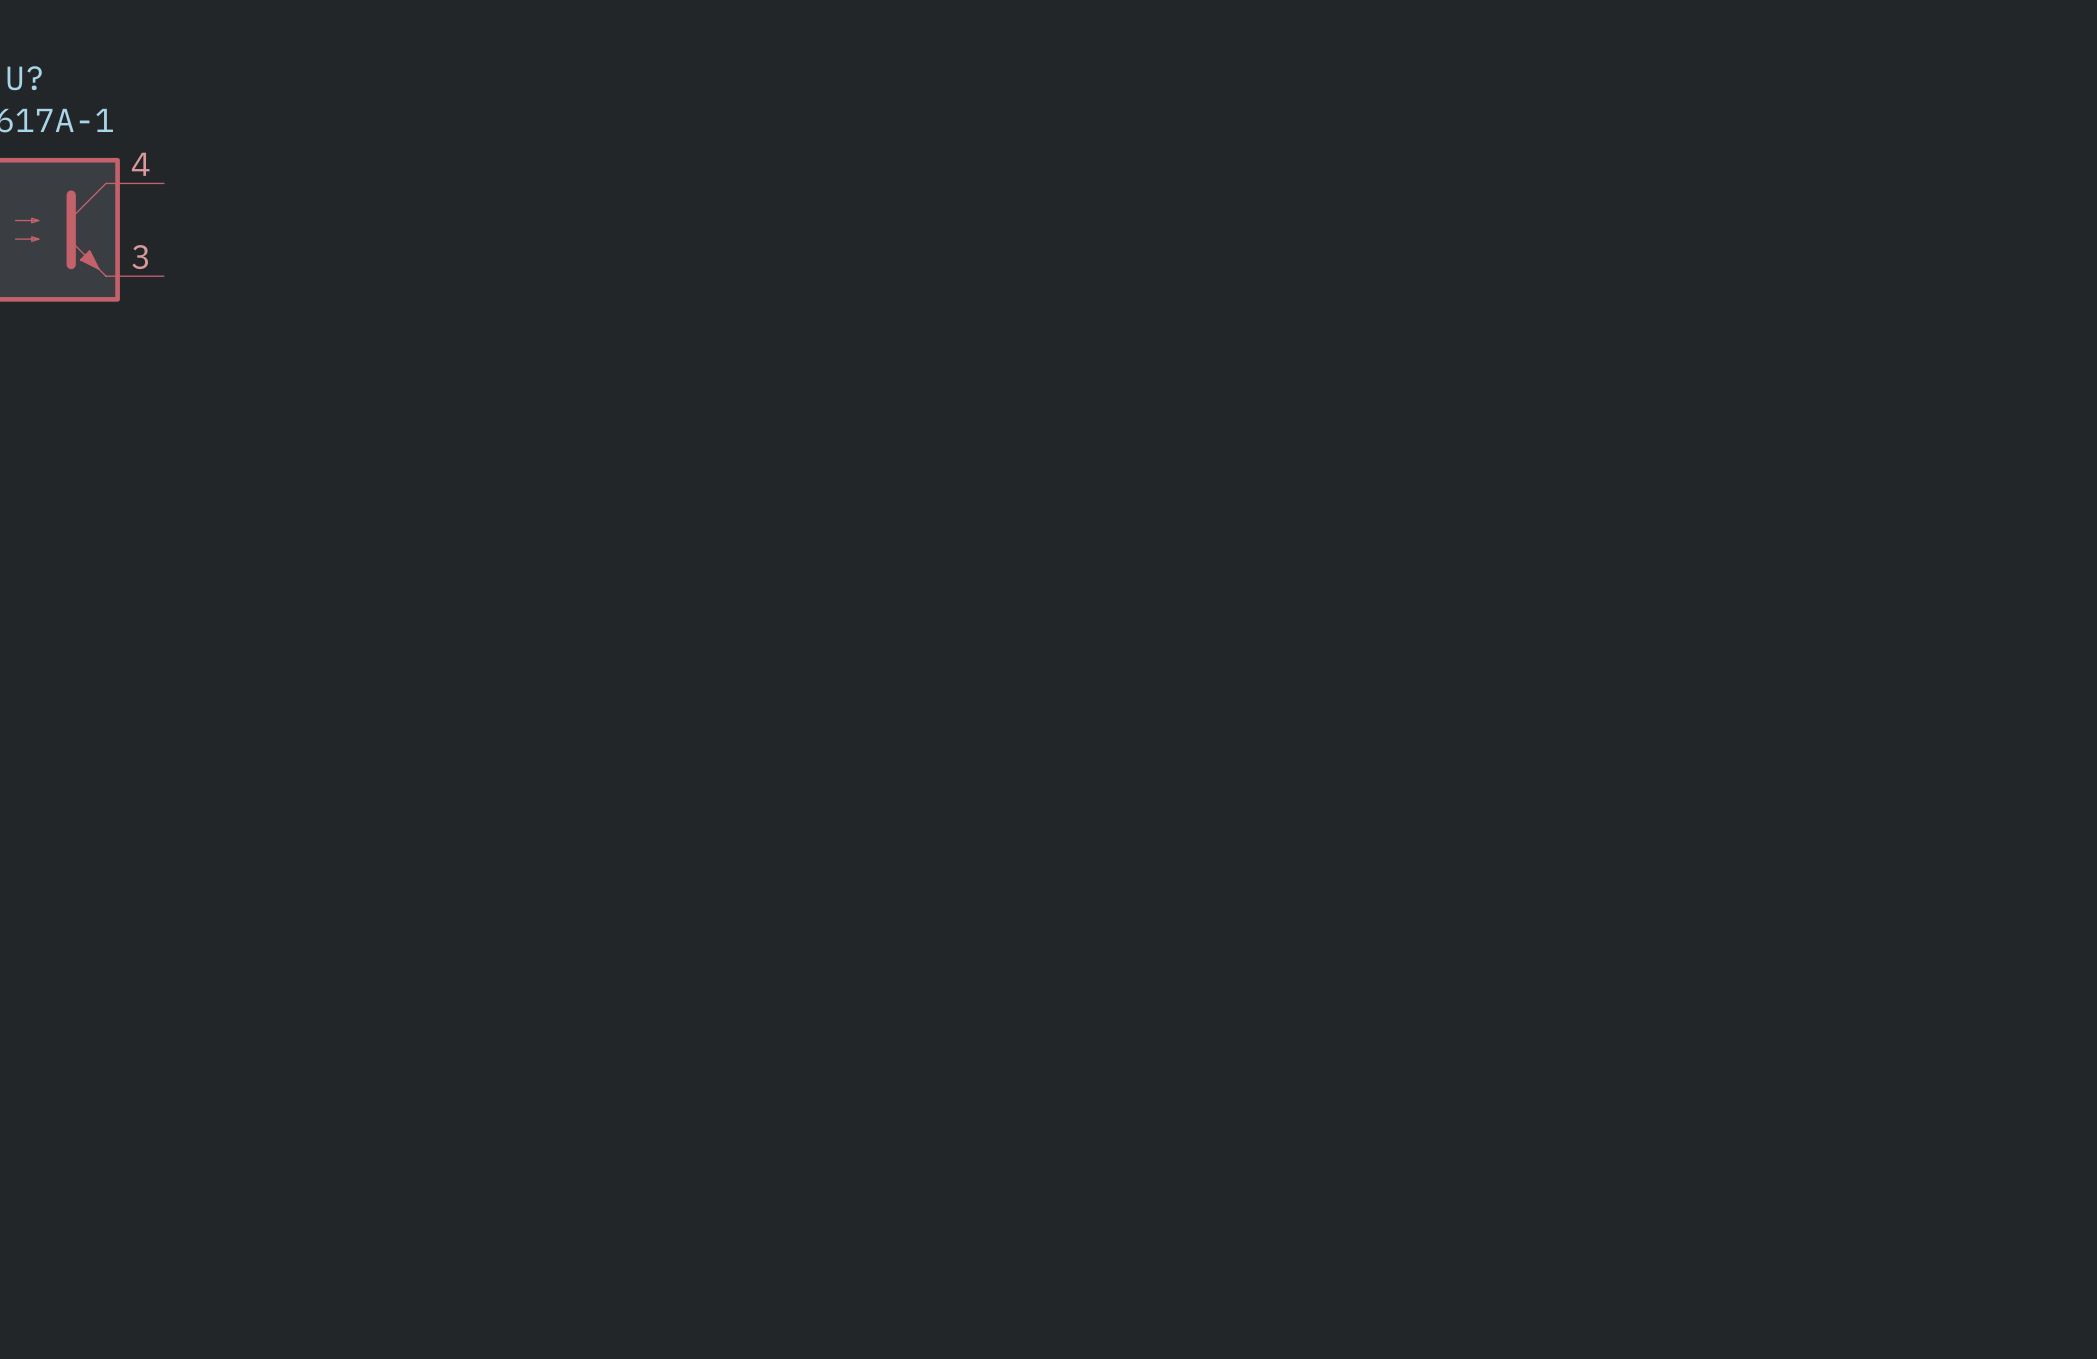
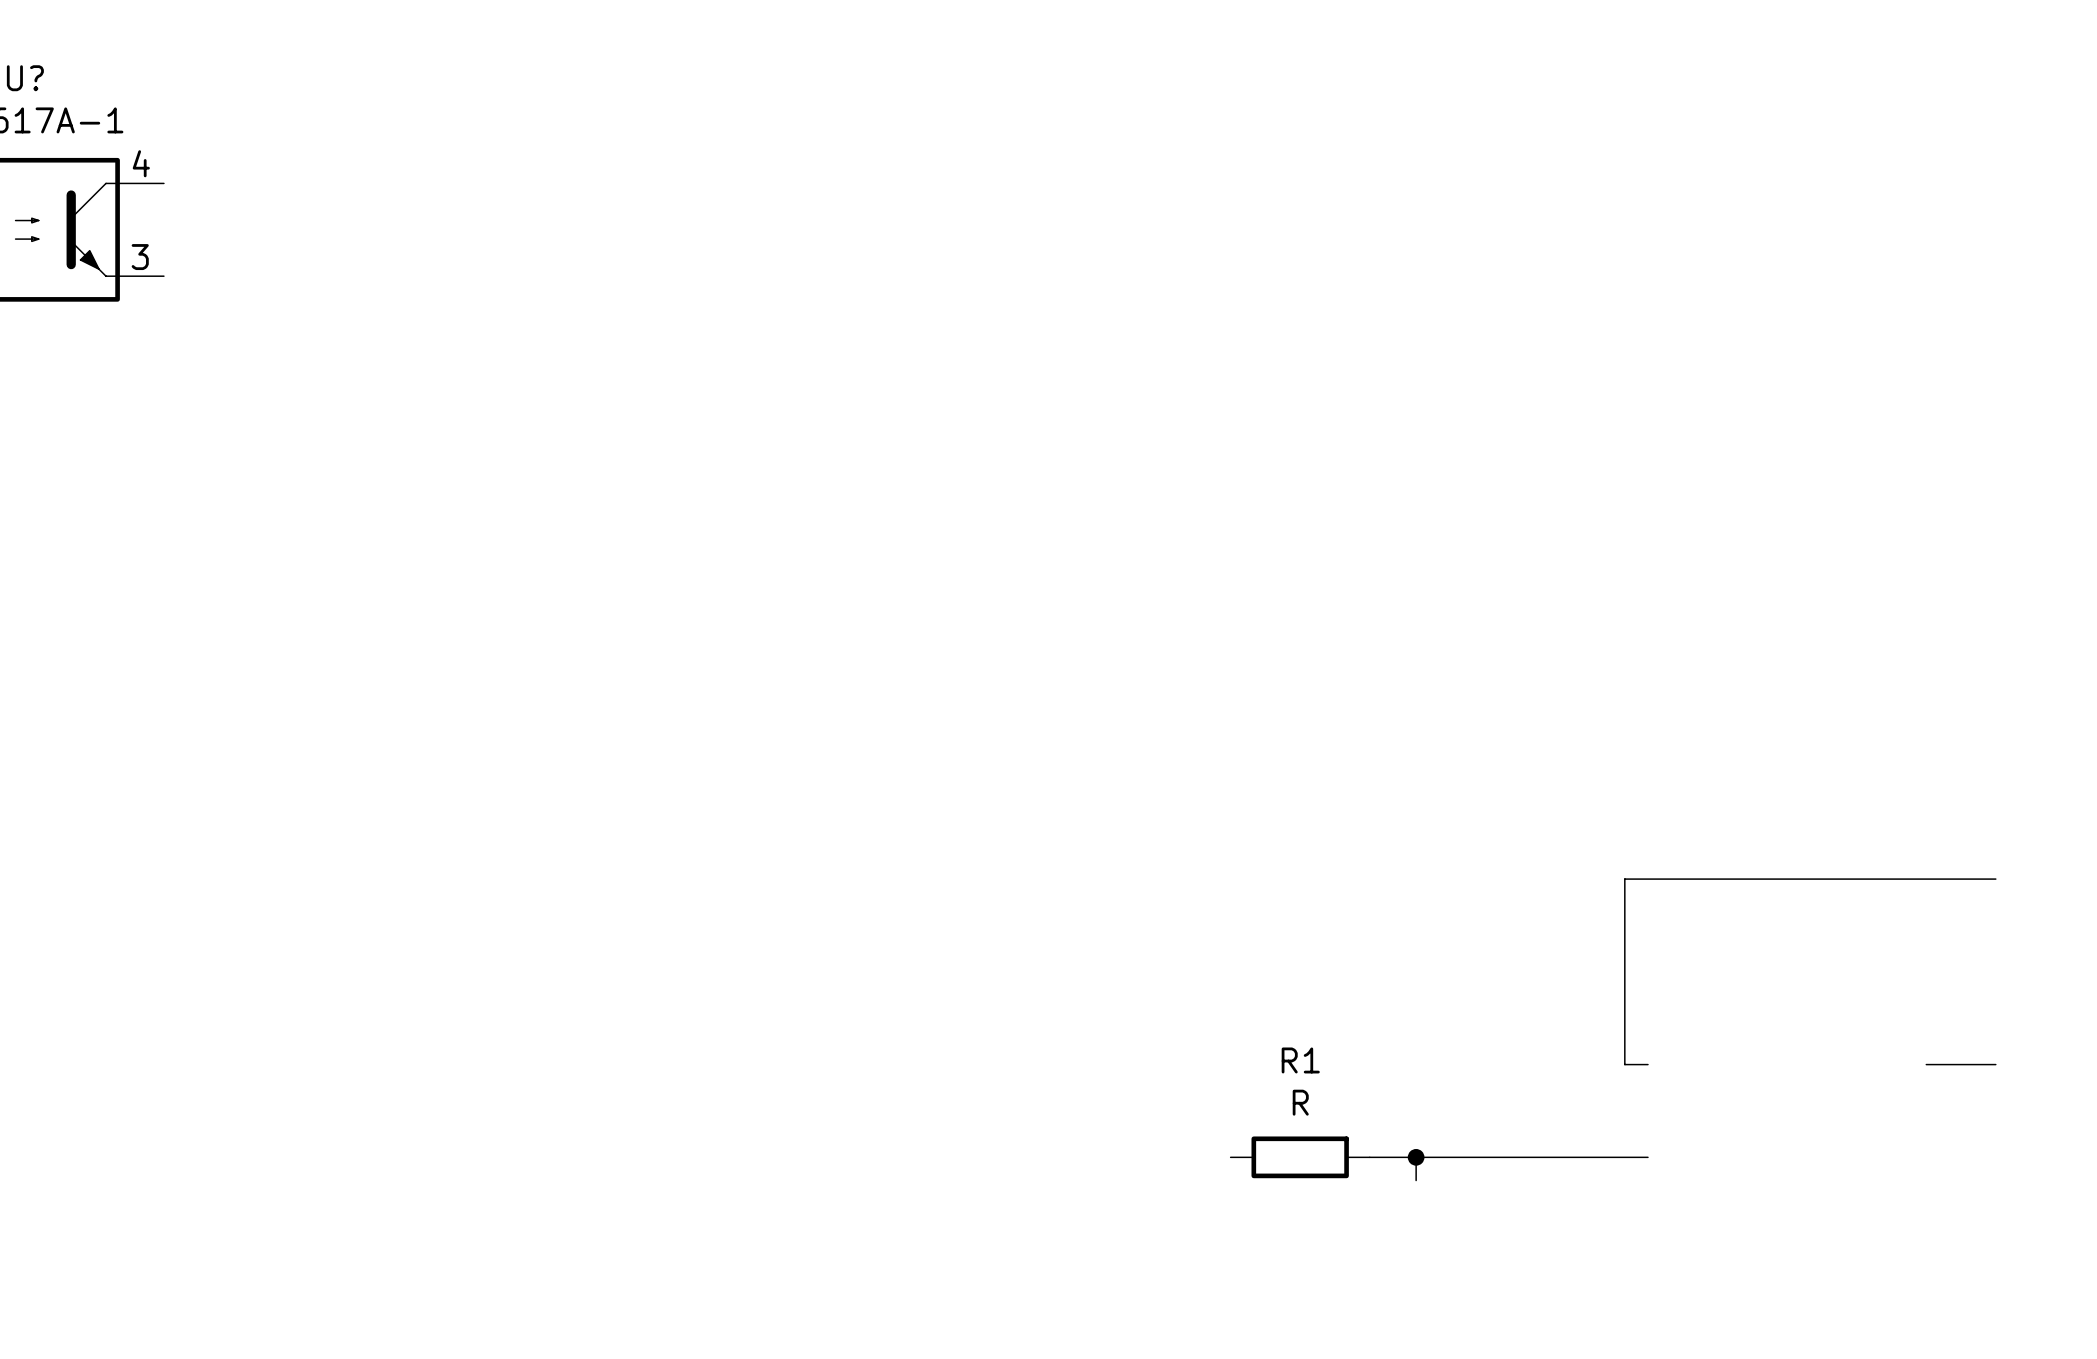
wire: none -> (1995, 879) (1624, 879) (1624, 1064) (1648, 1064)
wire: none -> (1926, 1064) (1995, 1064)
R1: none -> R (1300, 1157)
wire: none -> (1369, 1157) (1648, 1157)
wire: none -> (1416, 1157) (1416, 1180)
junction: none -> (1416, 1157)

